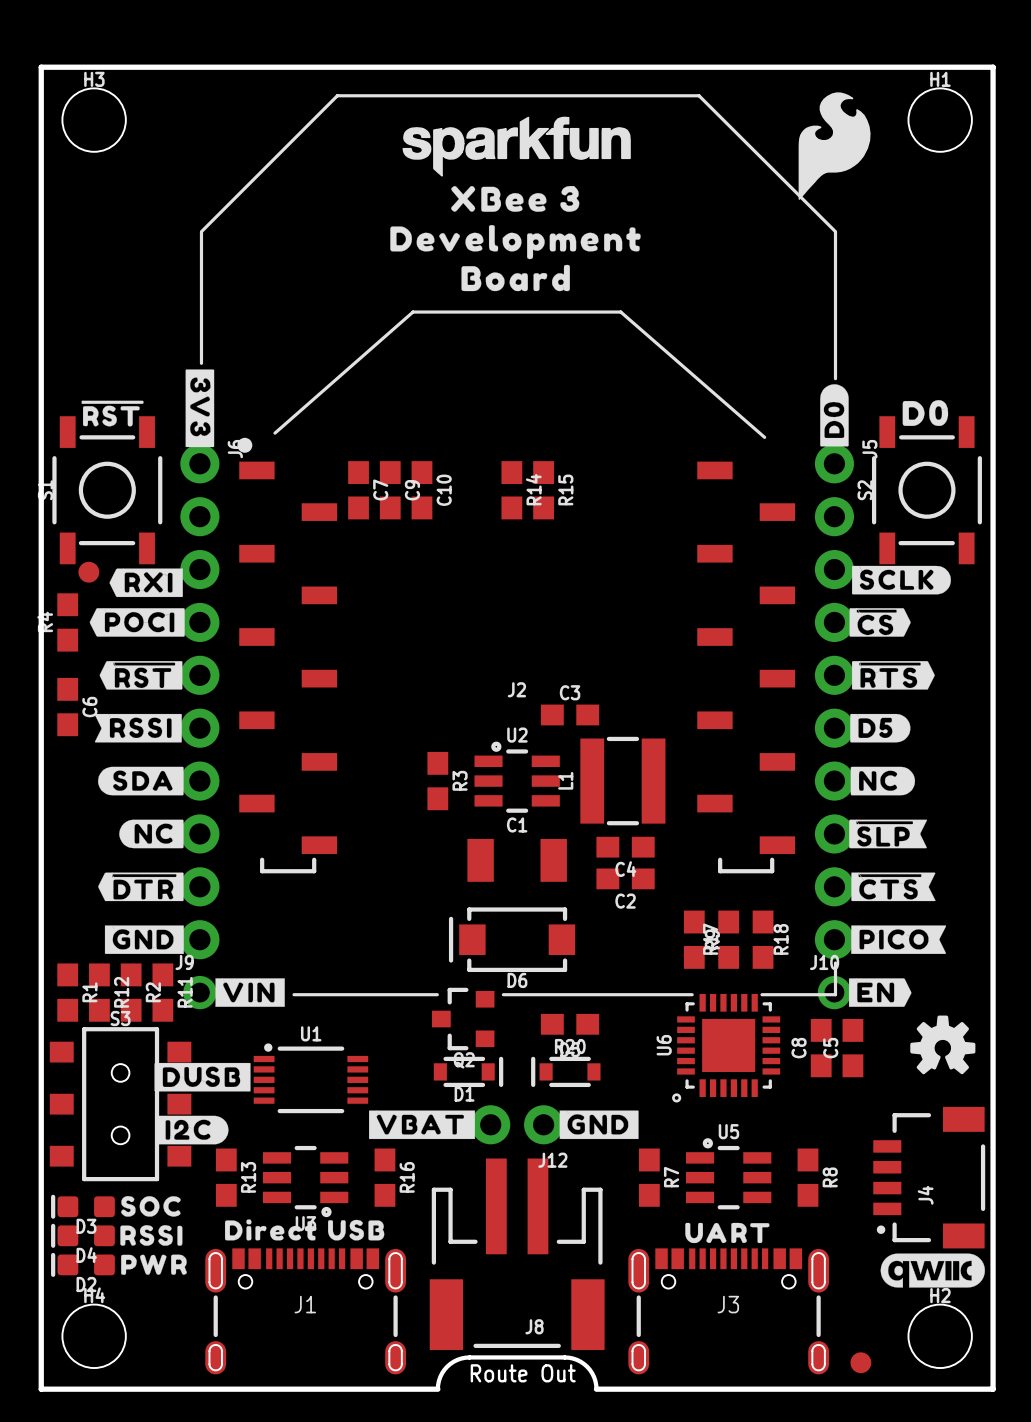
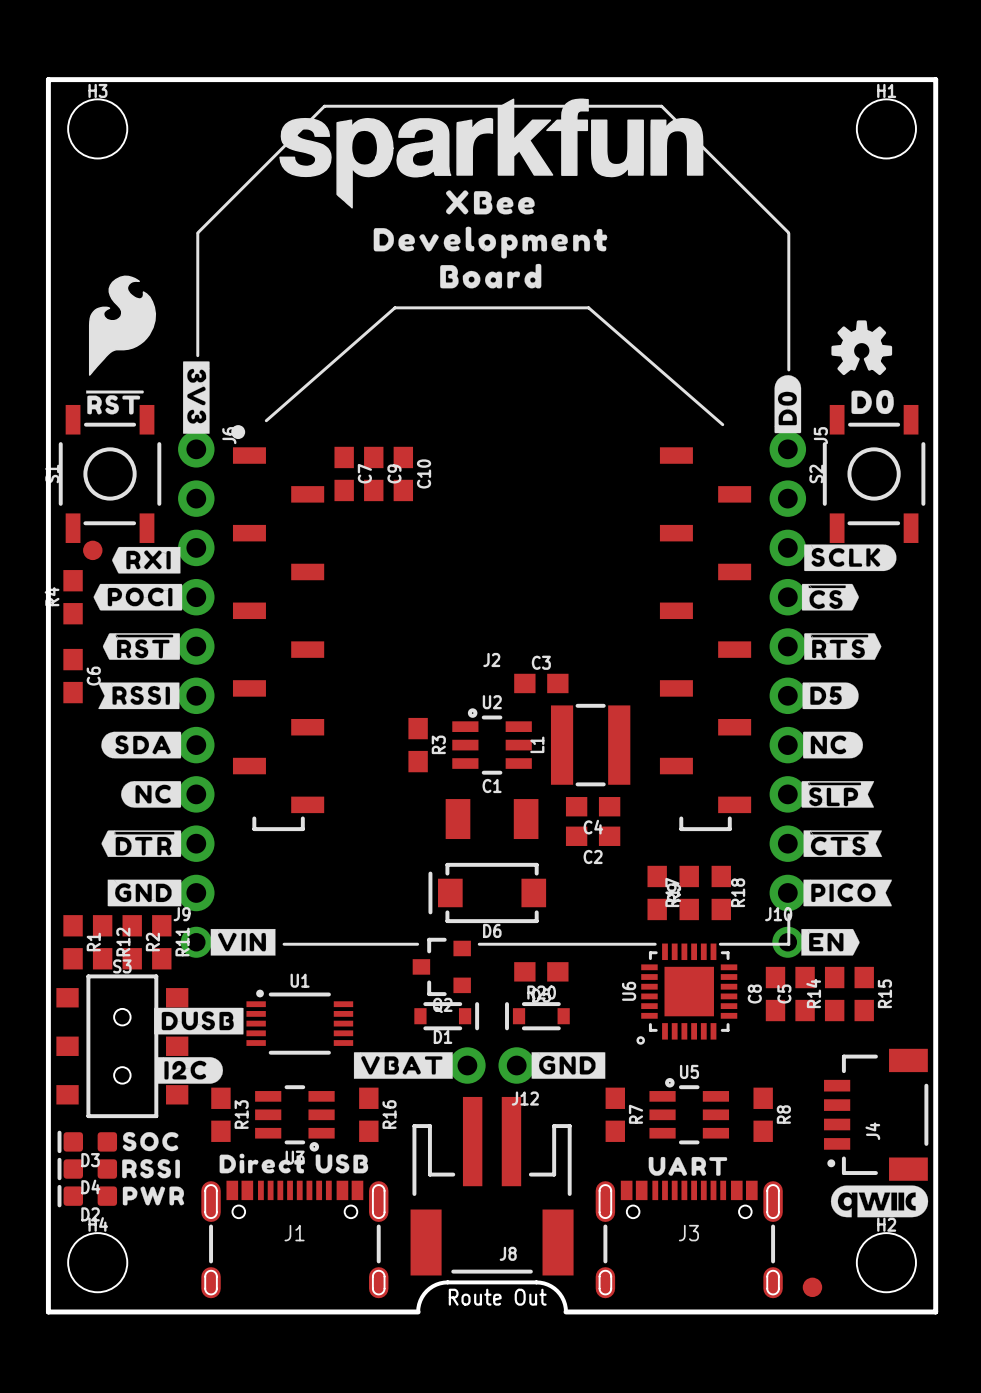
drawing: [798, 92, 871, 200] -> none
drawing shape: [402, 116, 631, 177] -> [279, 98, 704, 209]
drawing shape: [451, 185, 580, 212] -> [445, 190, 535, 215]
drawing: none -> [88, 275, 157, 376]
drawing: none -> [831, 320, 893, 376]
R14 name position: R14 (533, 489) -> R14 (813, 993)
R14 position: (511, 490) -> (834, 994)
R15 position: (543, 490) -> (864, 994)
drawing: [910, 1015, 976, 1075] -> none

